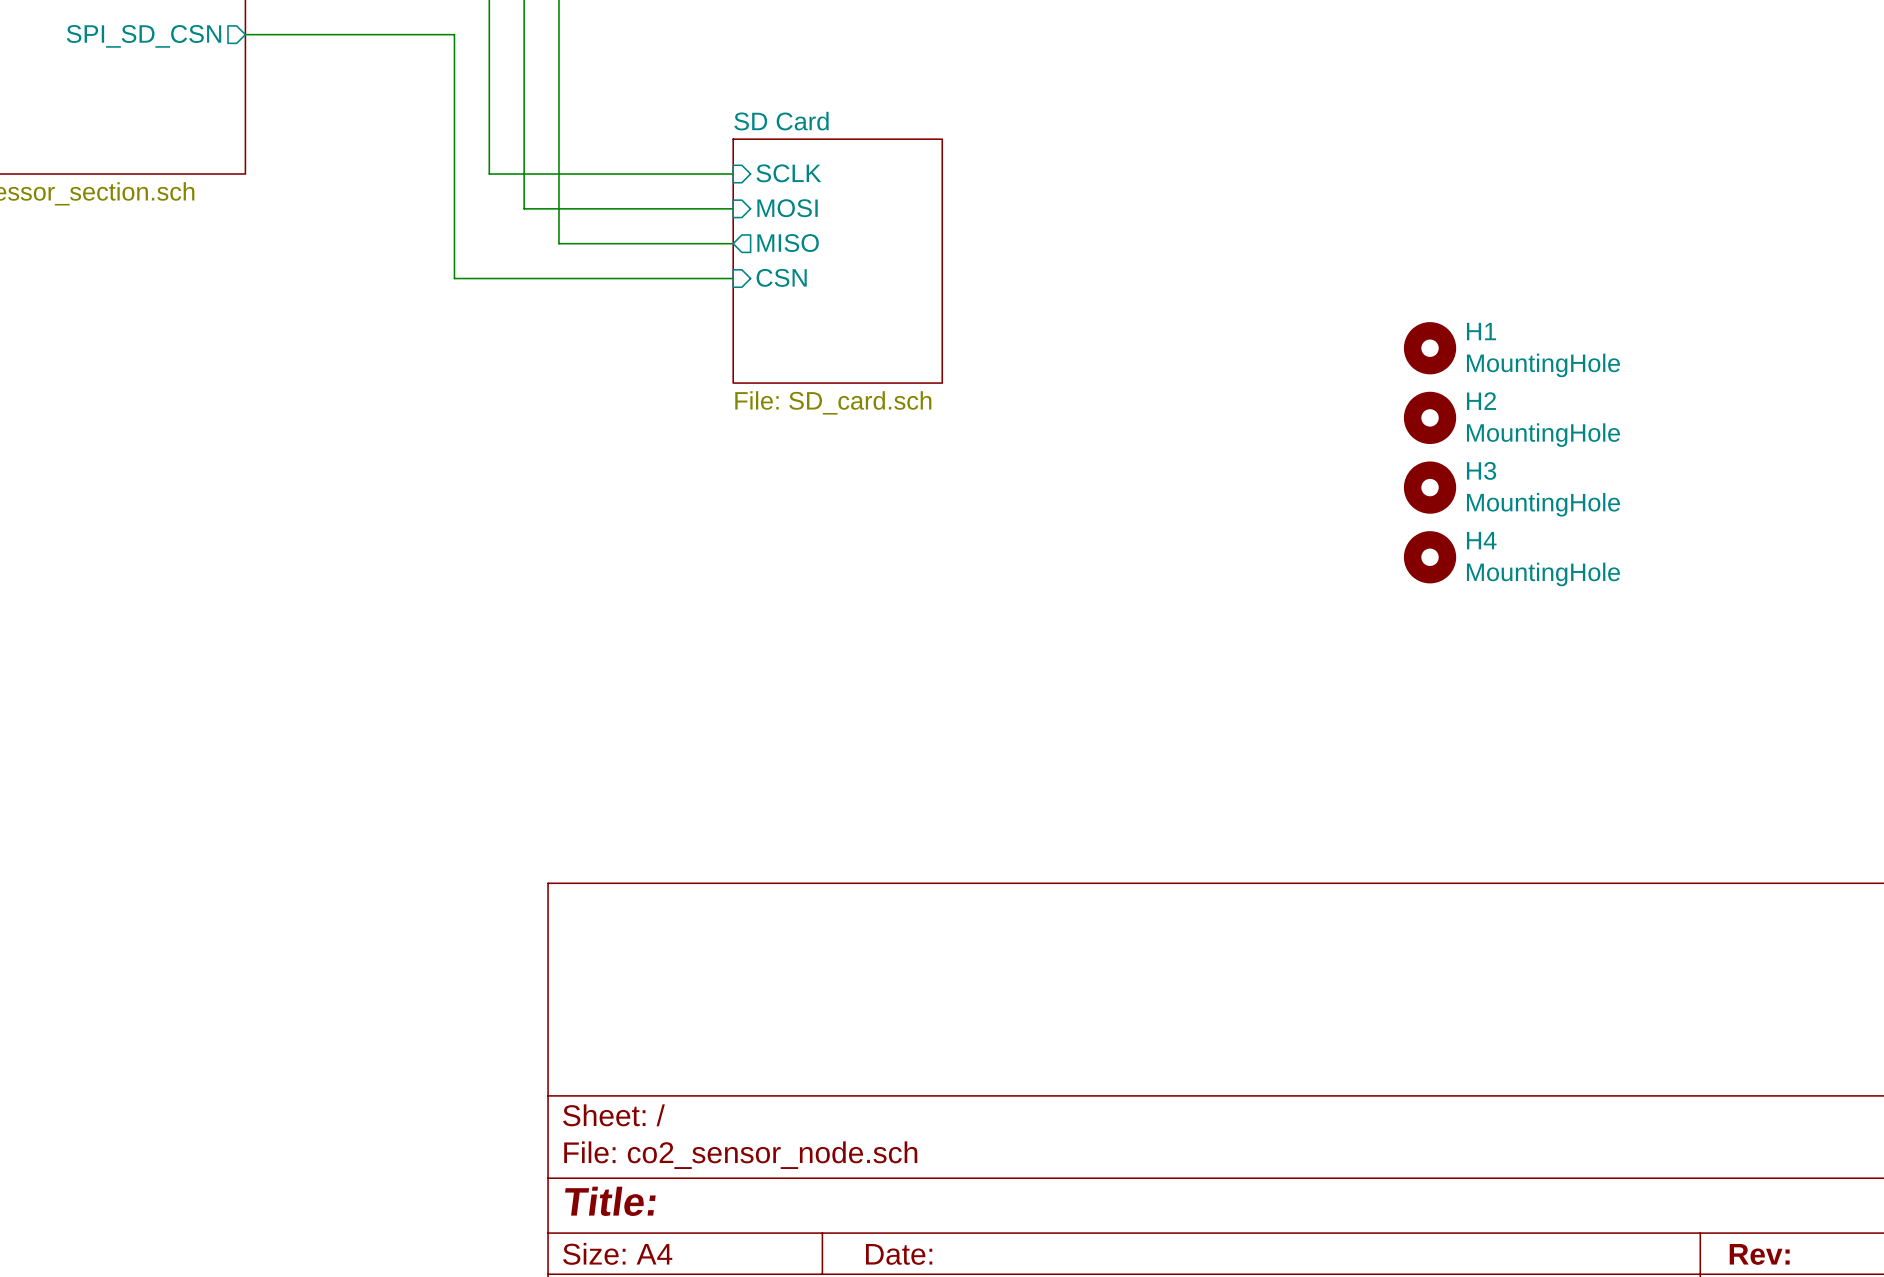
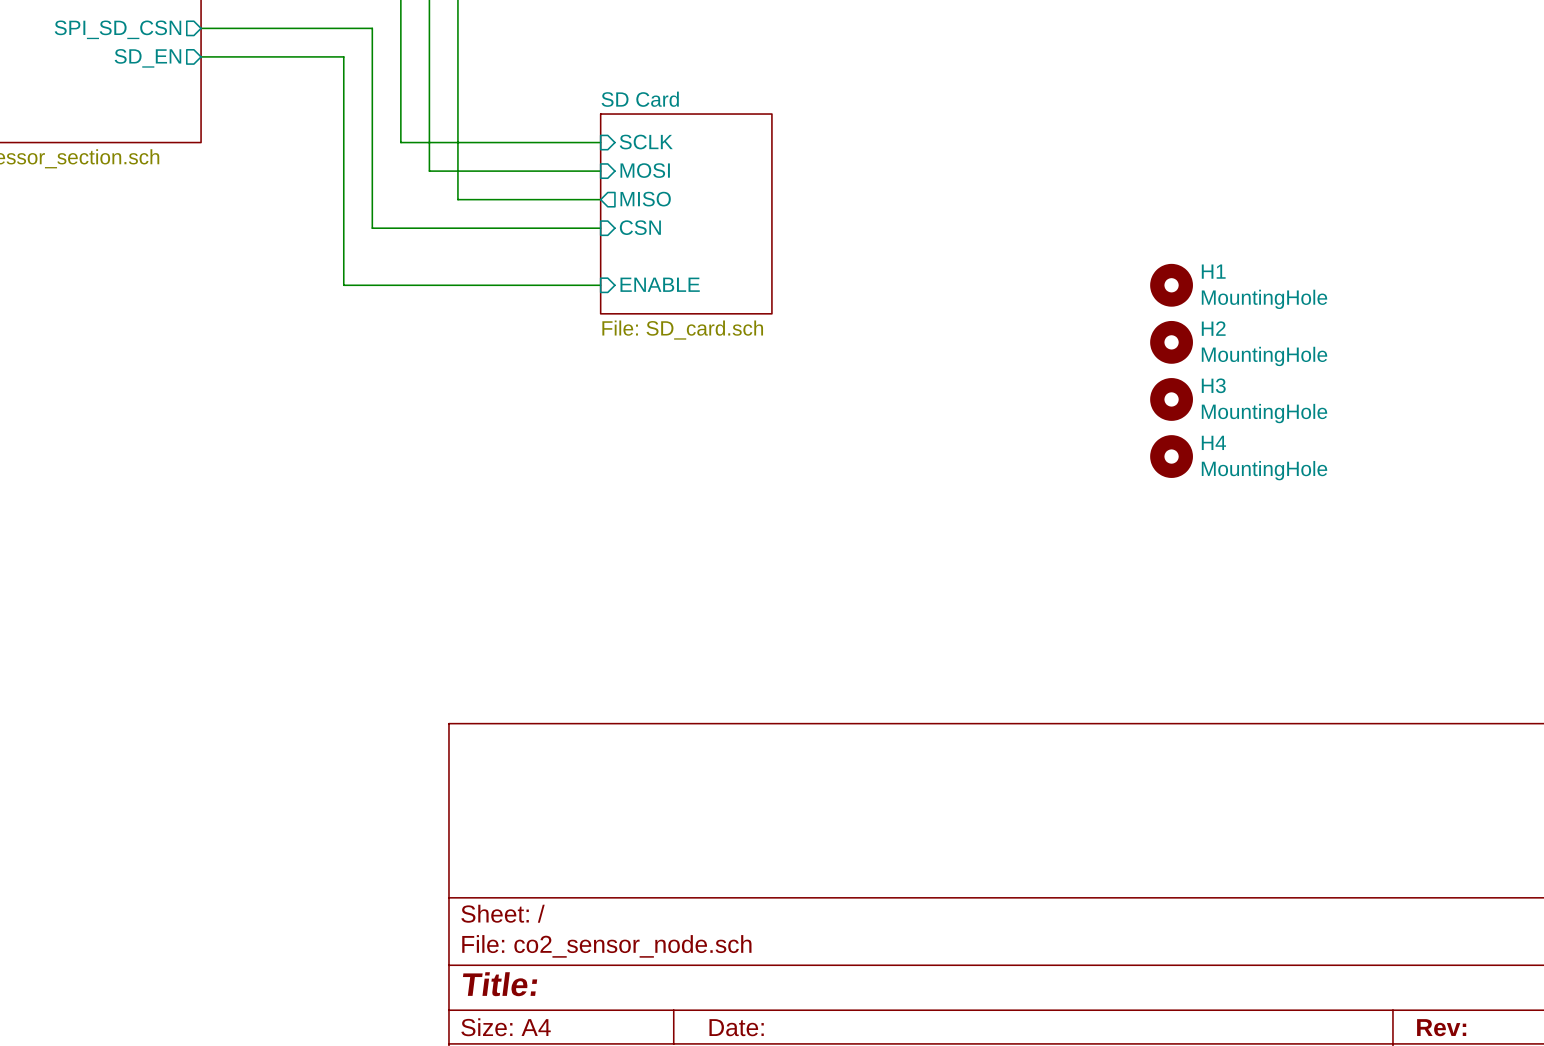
wire: none -> (201, 56) (343, 56) (343, 285) (600, 285)
sheet pin: none -> SD_EN (147, 58)
sheet pin: none -> ENABLE (660, 284)

